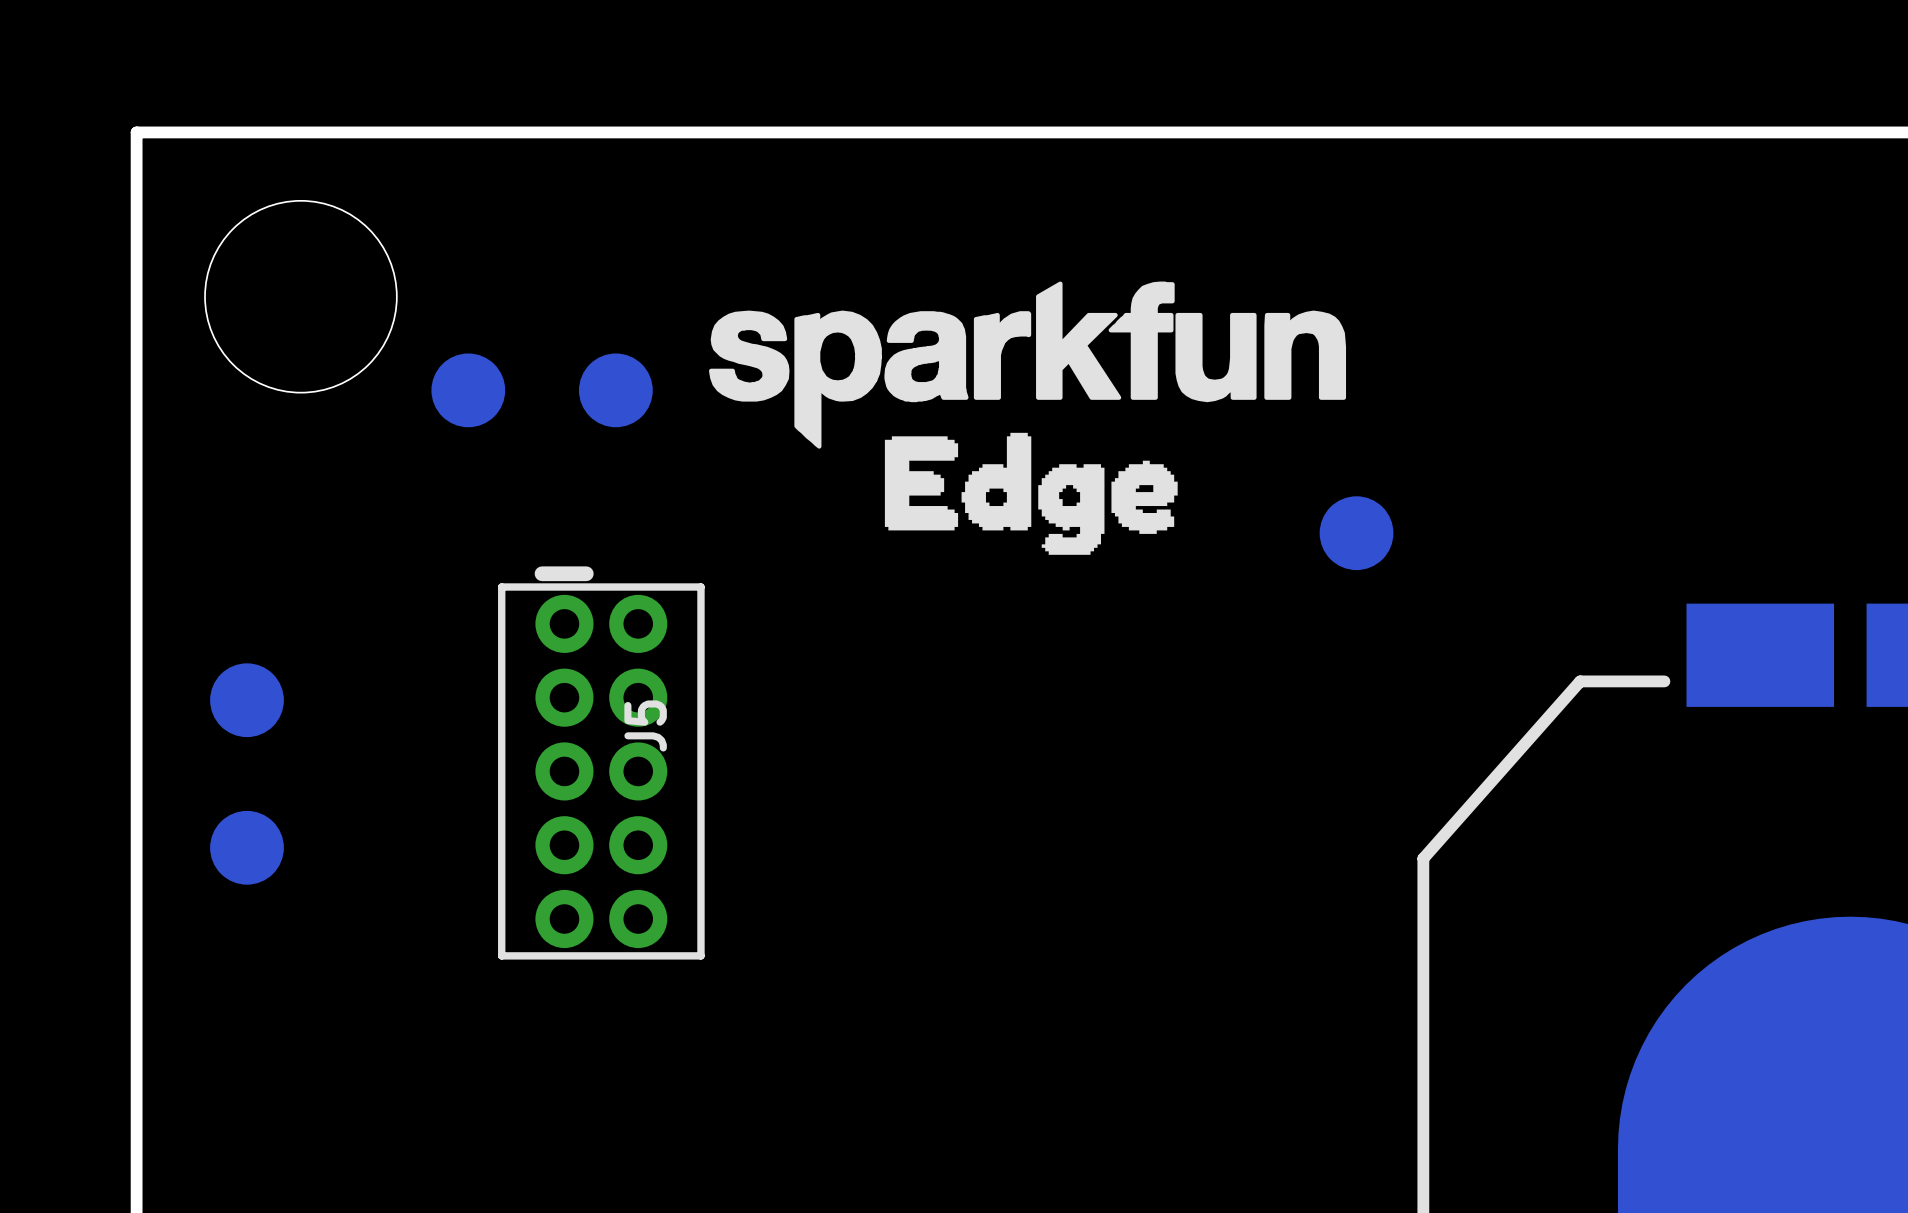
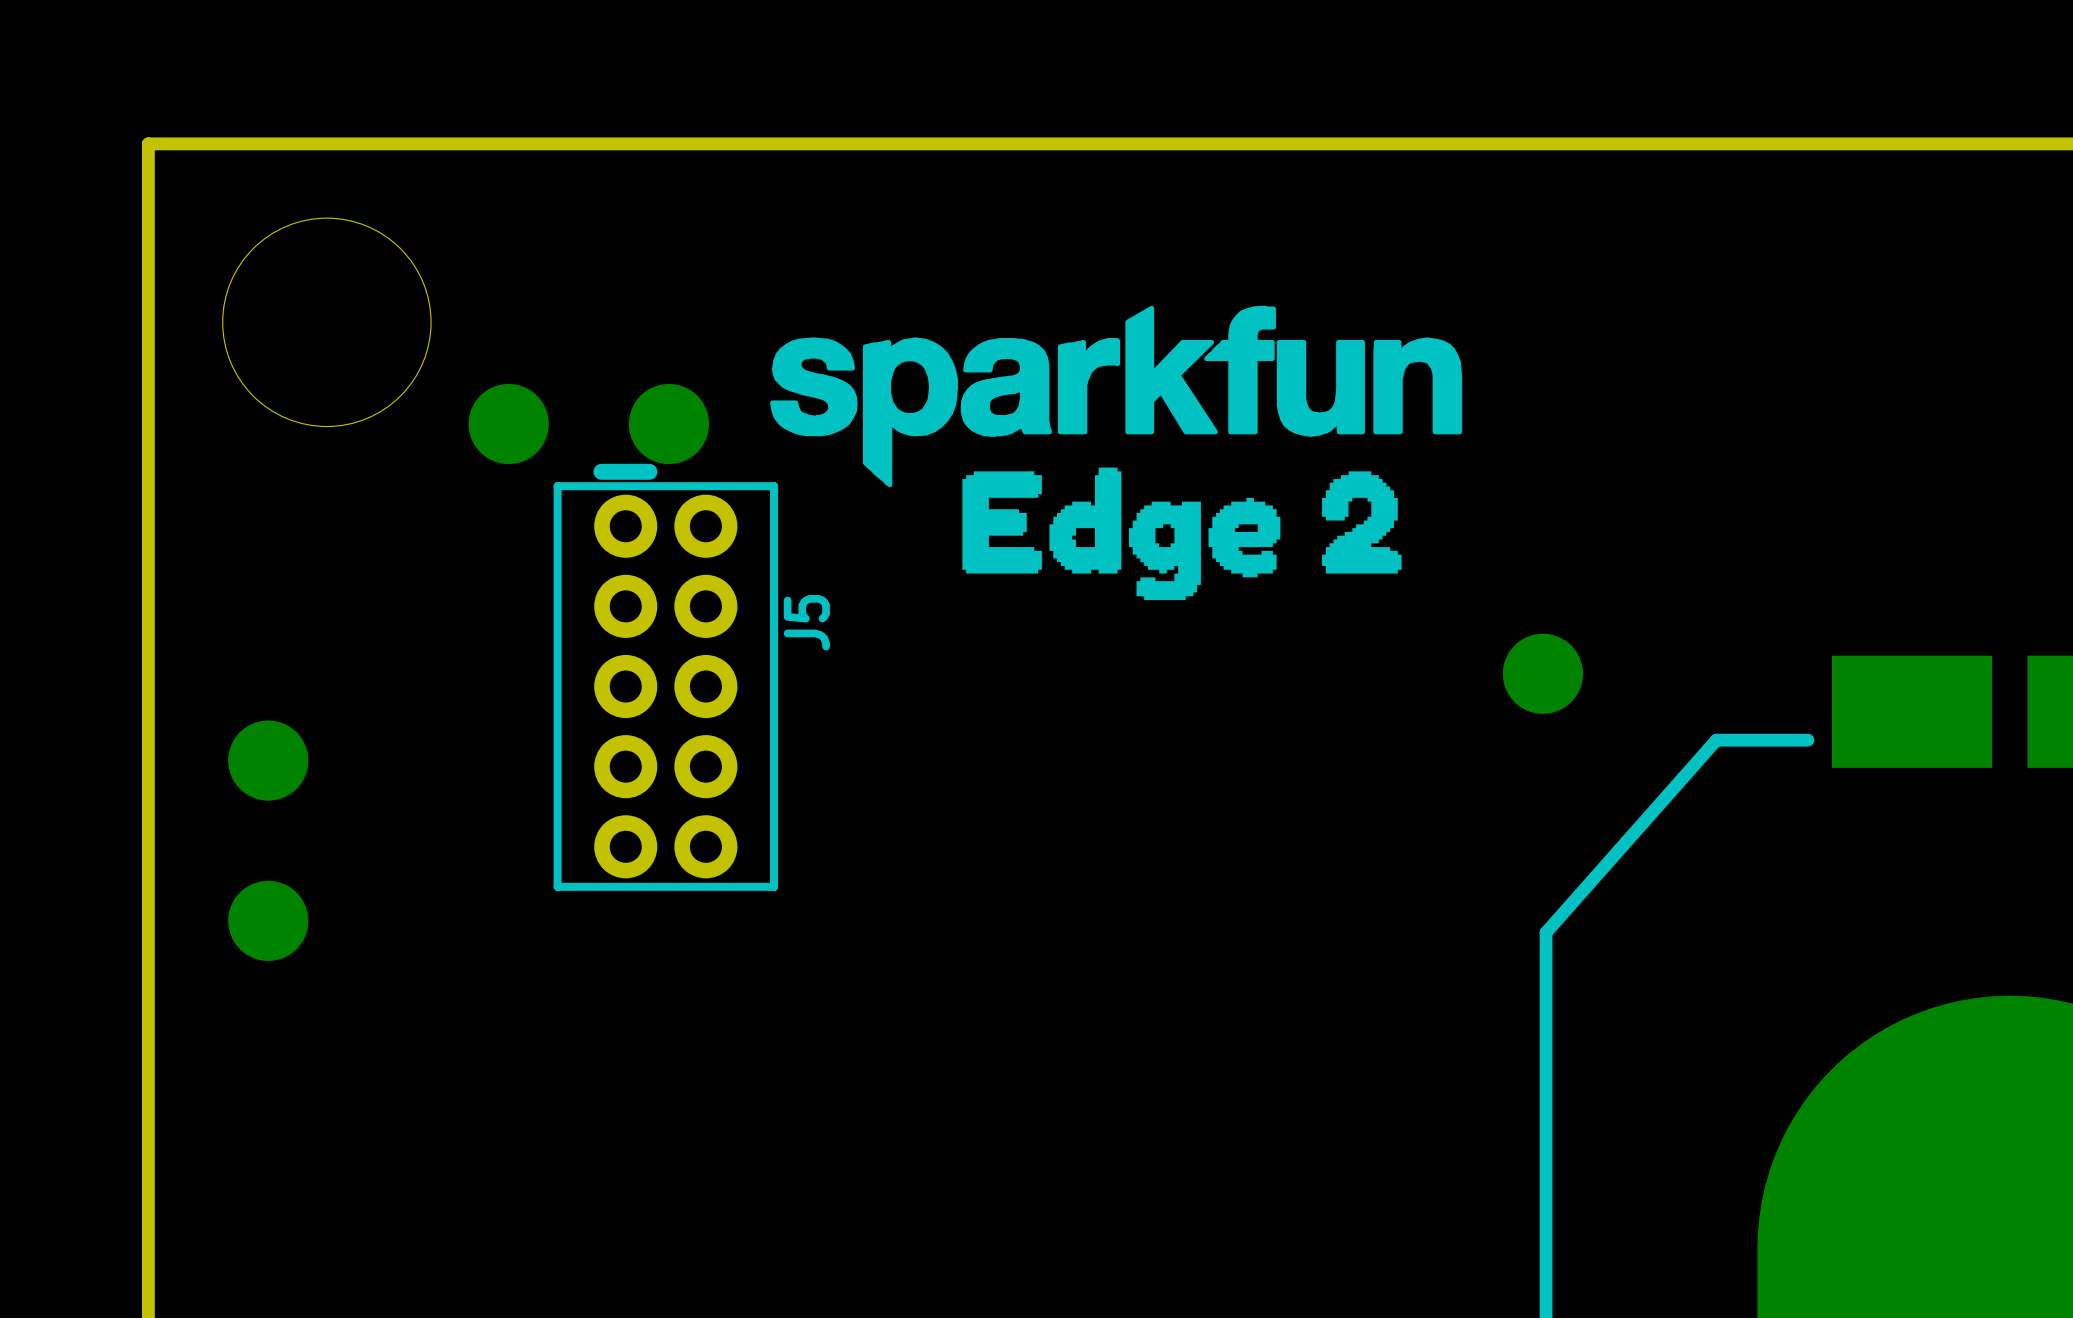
drawing shape: [884, 432, 1178, 555] -> [962, 467, 1402, 601]
part position: (1356, 533) -> (1542, 673)
J5 name position: J5 (645, 725) -> J5 (806, 622)
J5 position: (601, 762) -> (665, 677)

